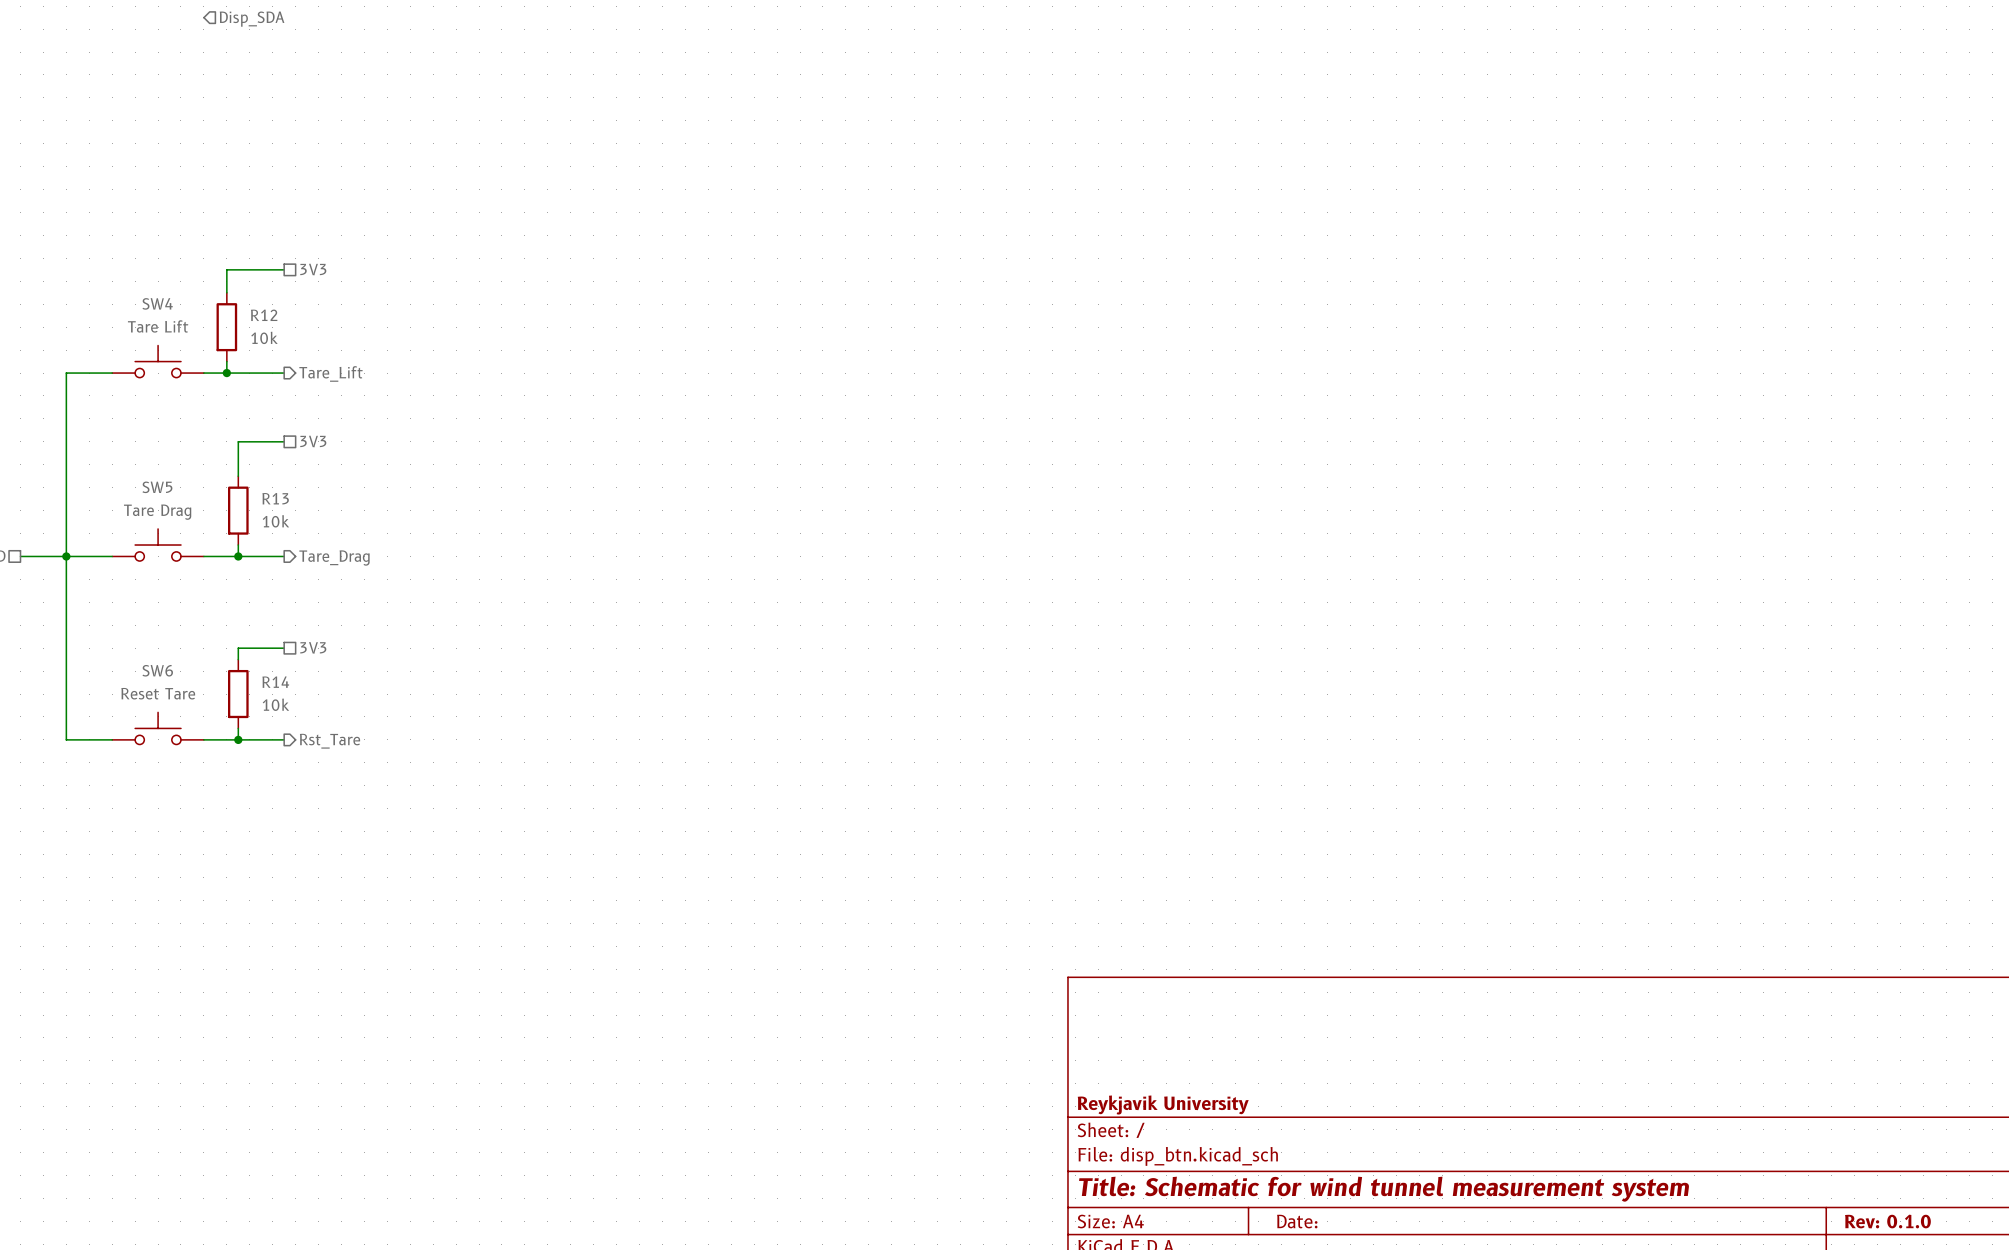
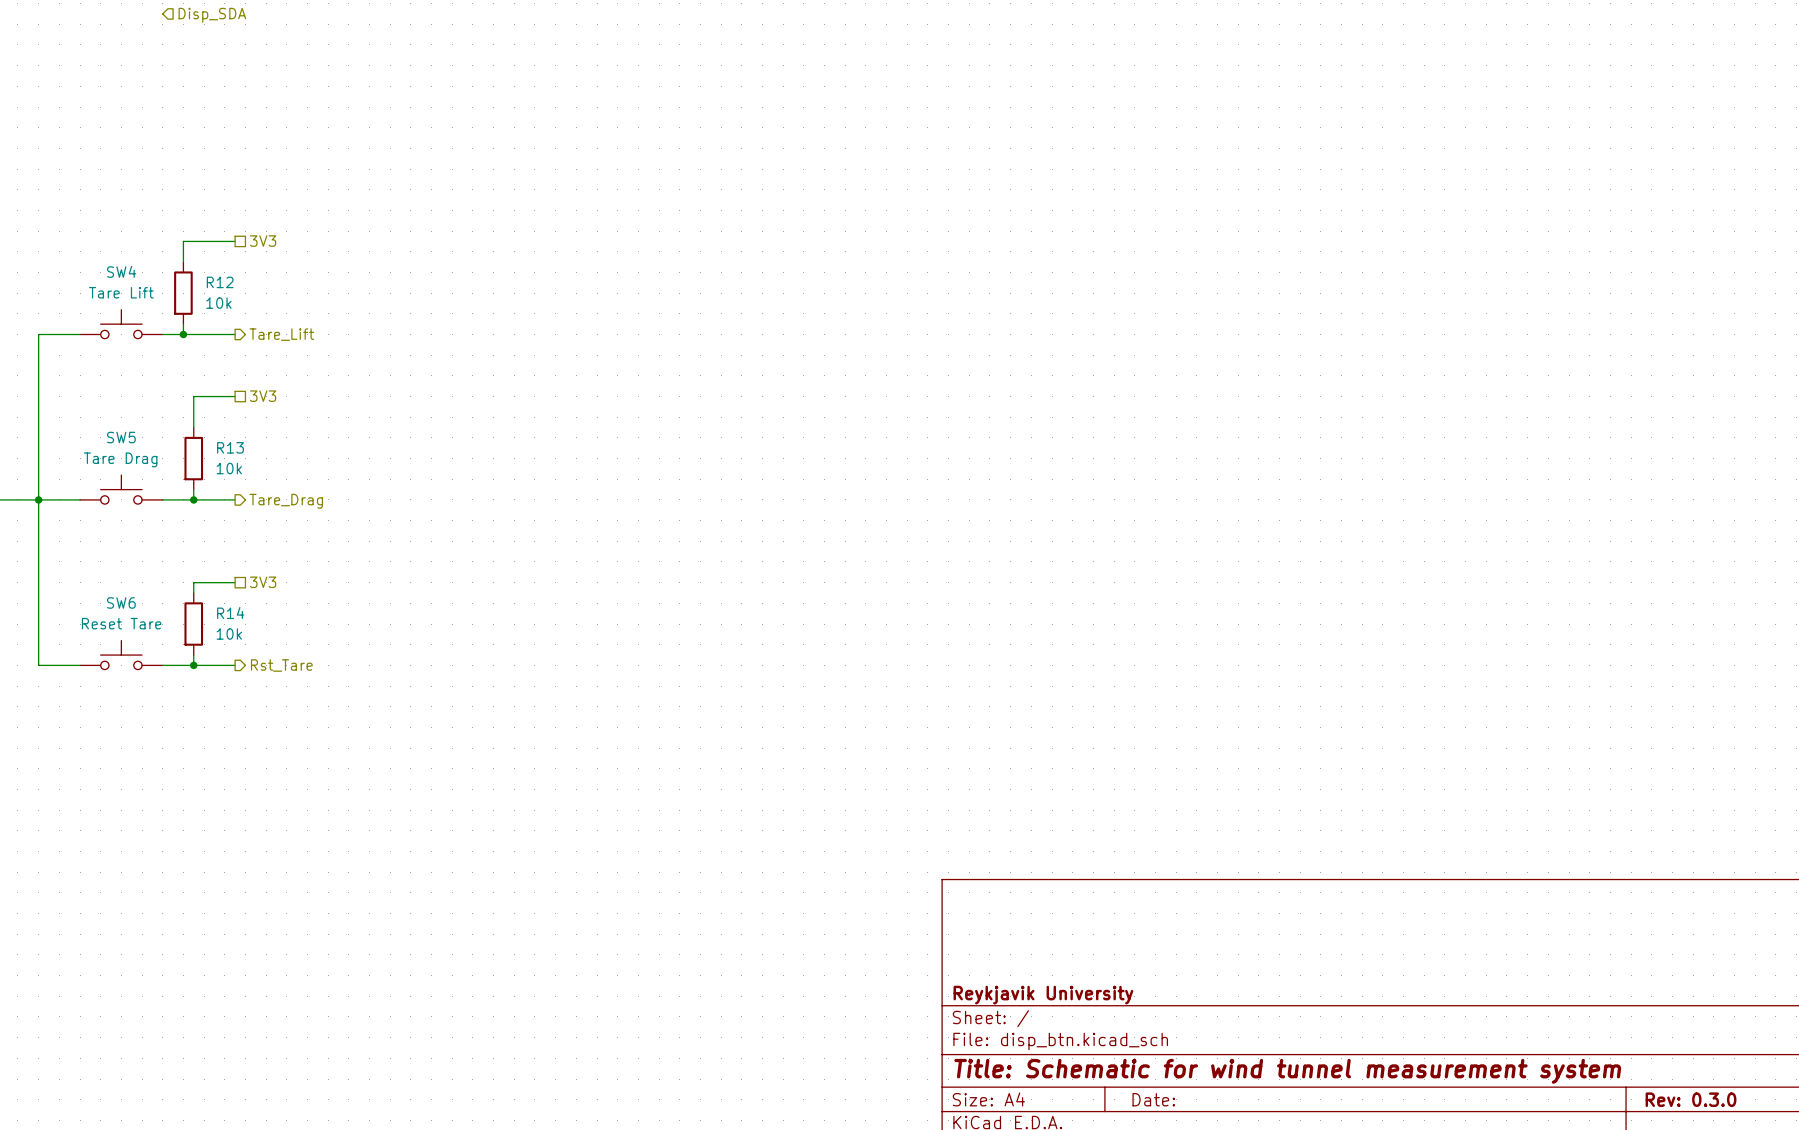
title block: Rev: 0.1.0 (1887, 1221) -> Rev: 0.3.0 (1691, 1099)

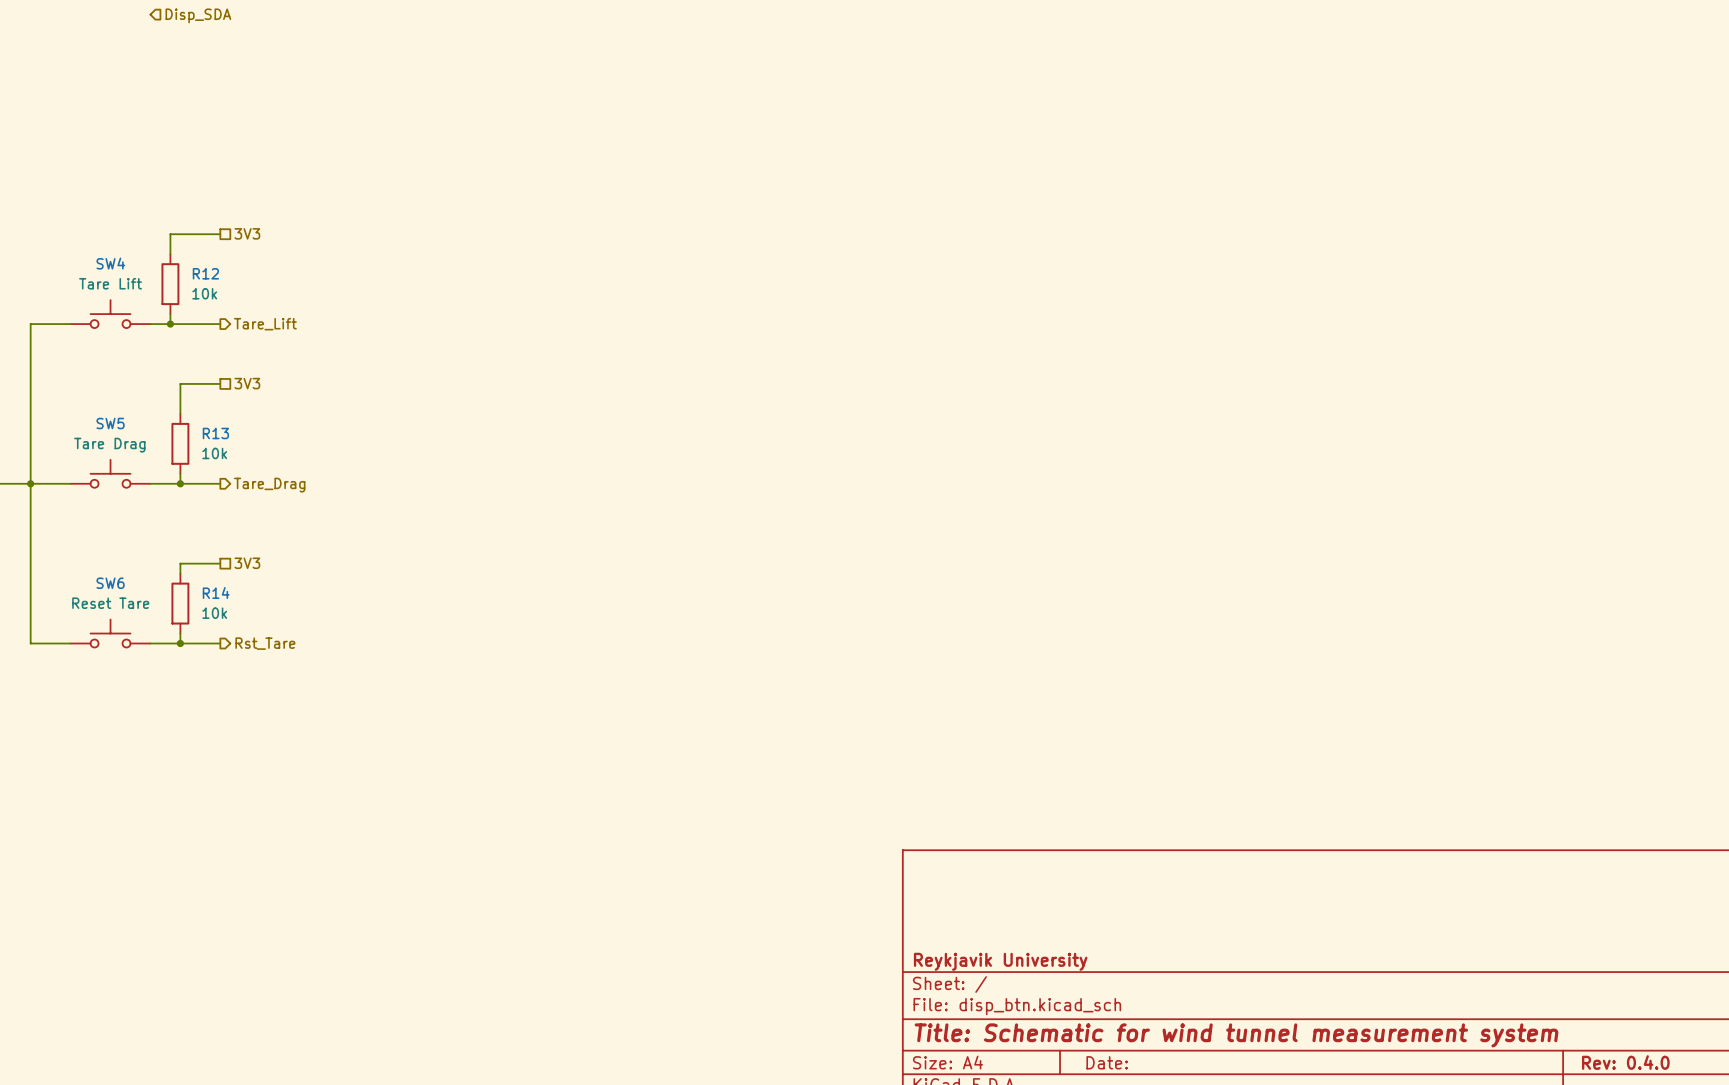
title block: Rev: 0.3.0 (1691, 1099) -> Rev: 0.4.0 (1625, 1062)

